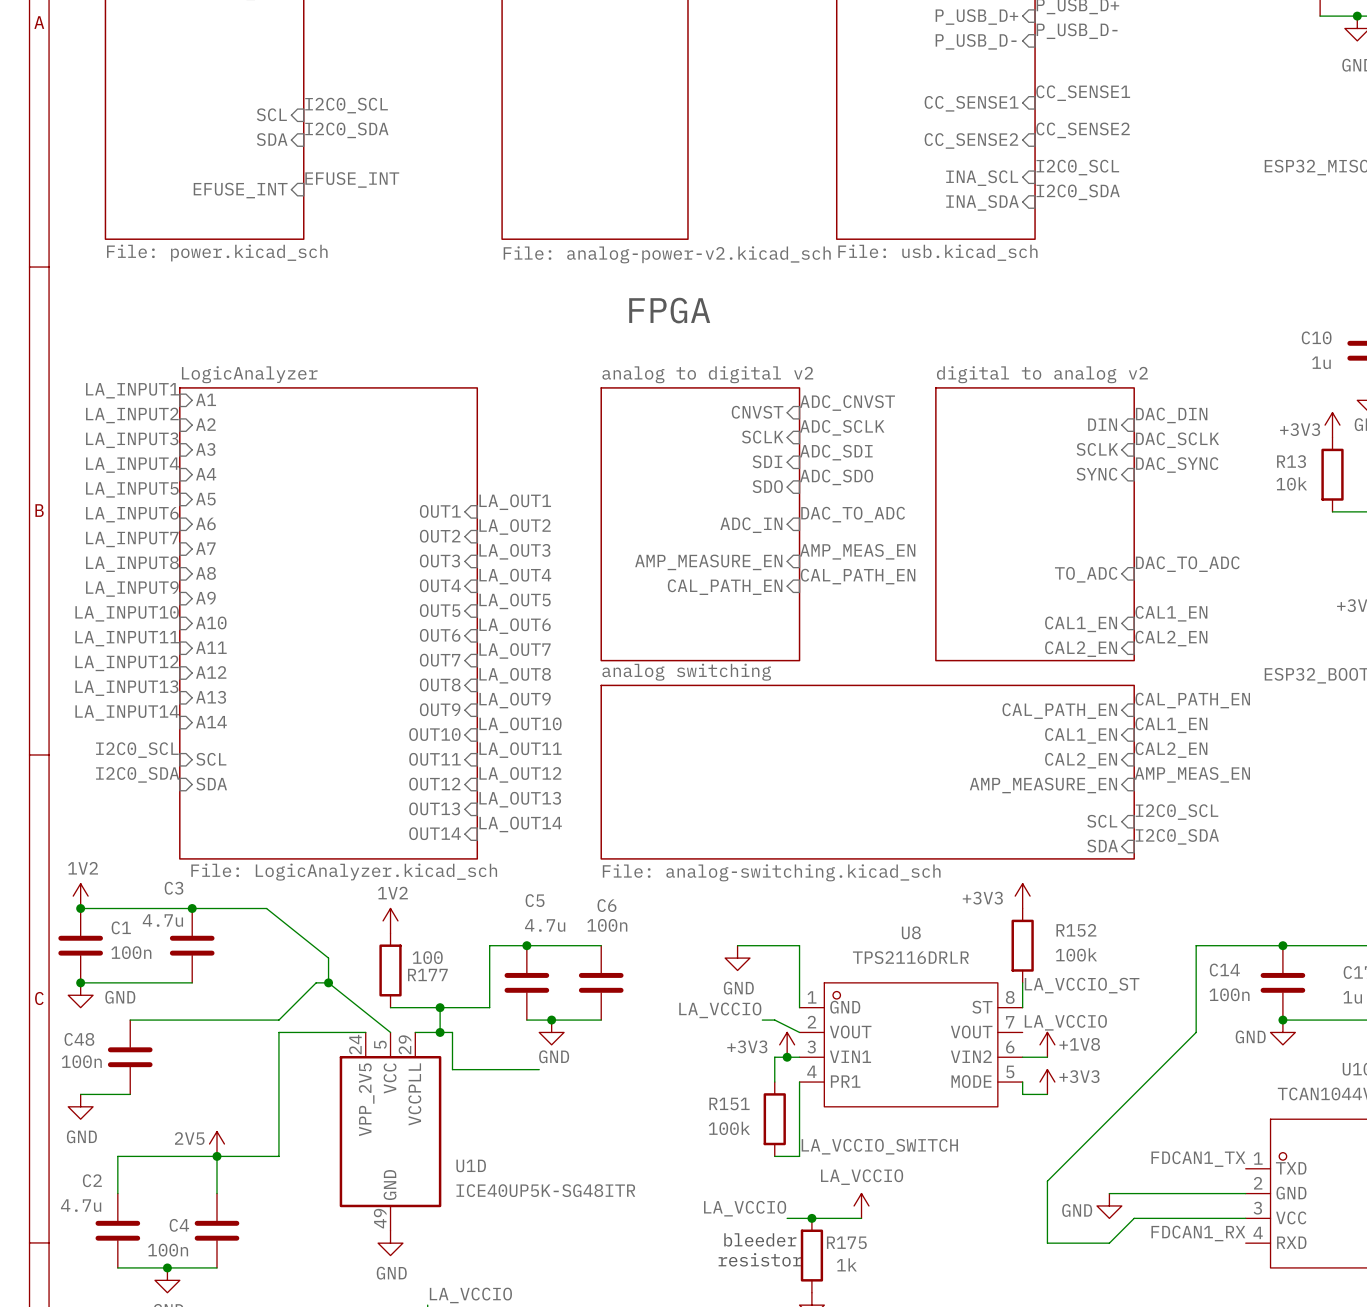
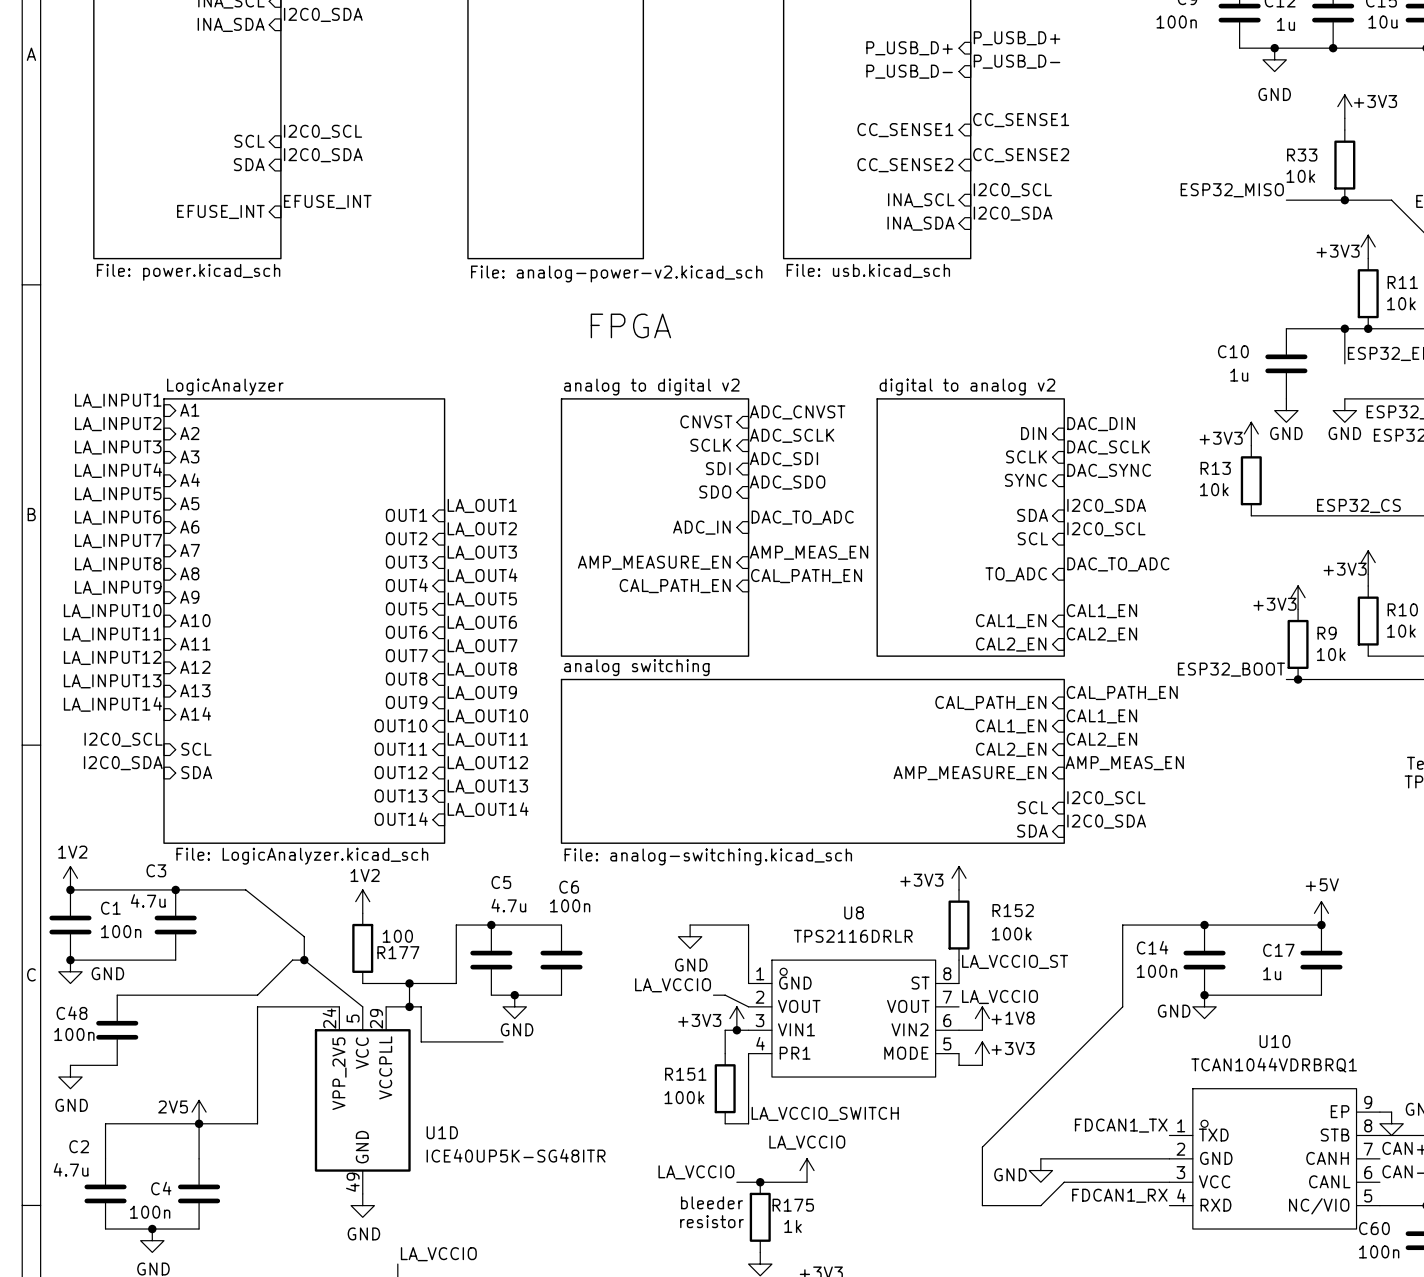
label: none -> I2C0_SDA (1106, 505)
sheet pin: none -> SDA (1032, 515)
label: none -> I2C0_SCL (1106, 529)
sheet pin: none -> SCL (1032, 538)

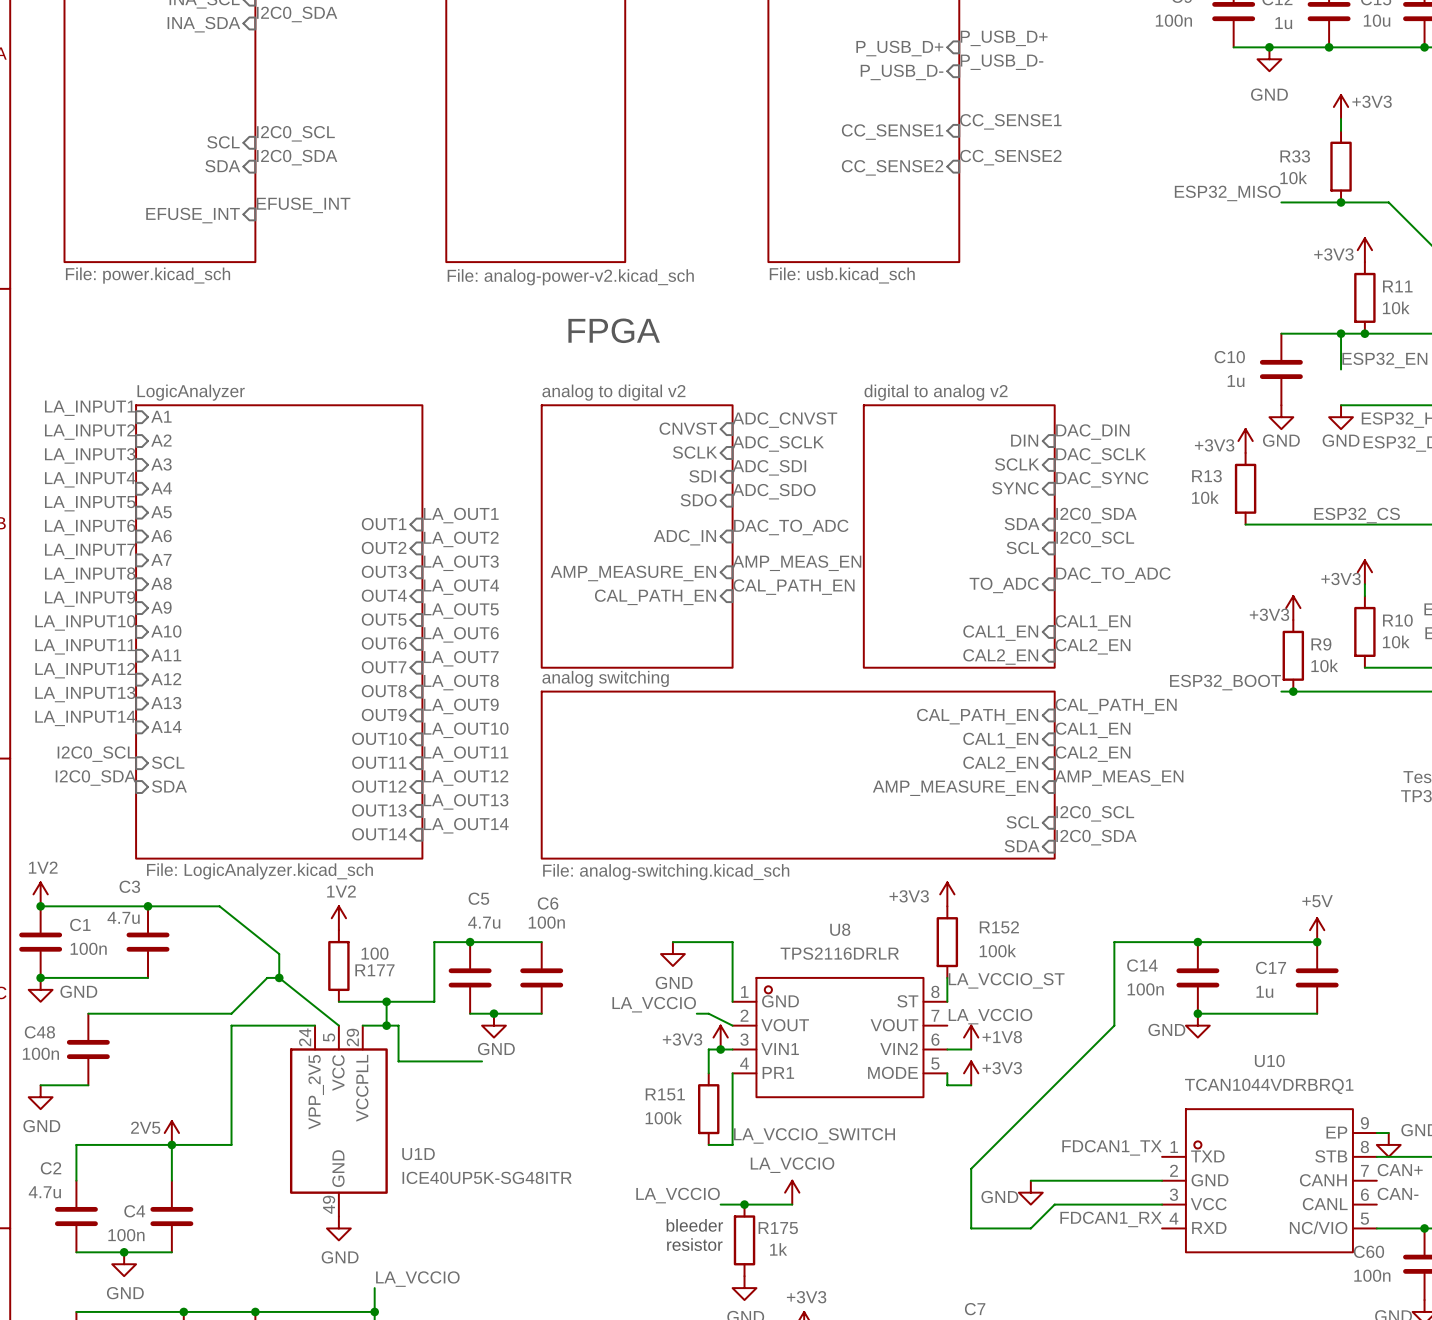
label: I2C0_SCL (1012, 190) -> none
sheet pin: INA_SCL (921, 200) -> none
label: I2C0_SDA (1013, 213) -> none
sheet pin: INA_SDA (920, 223) -> none

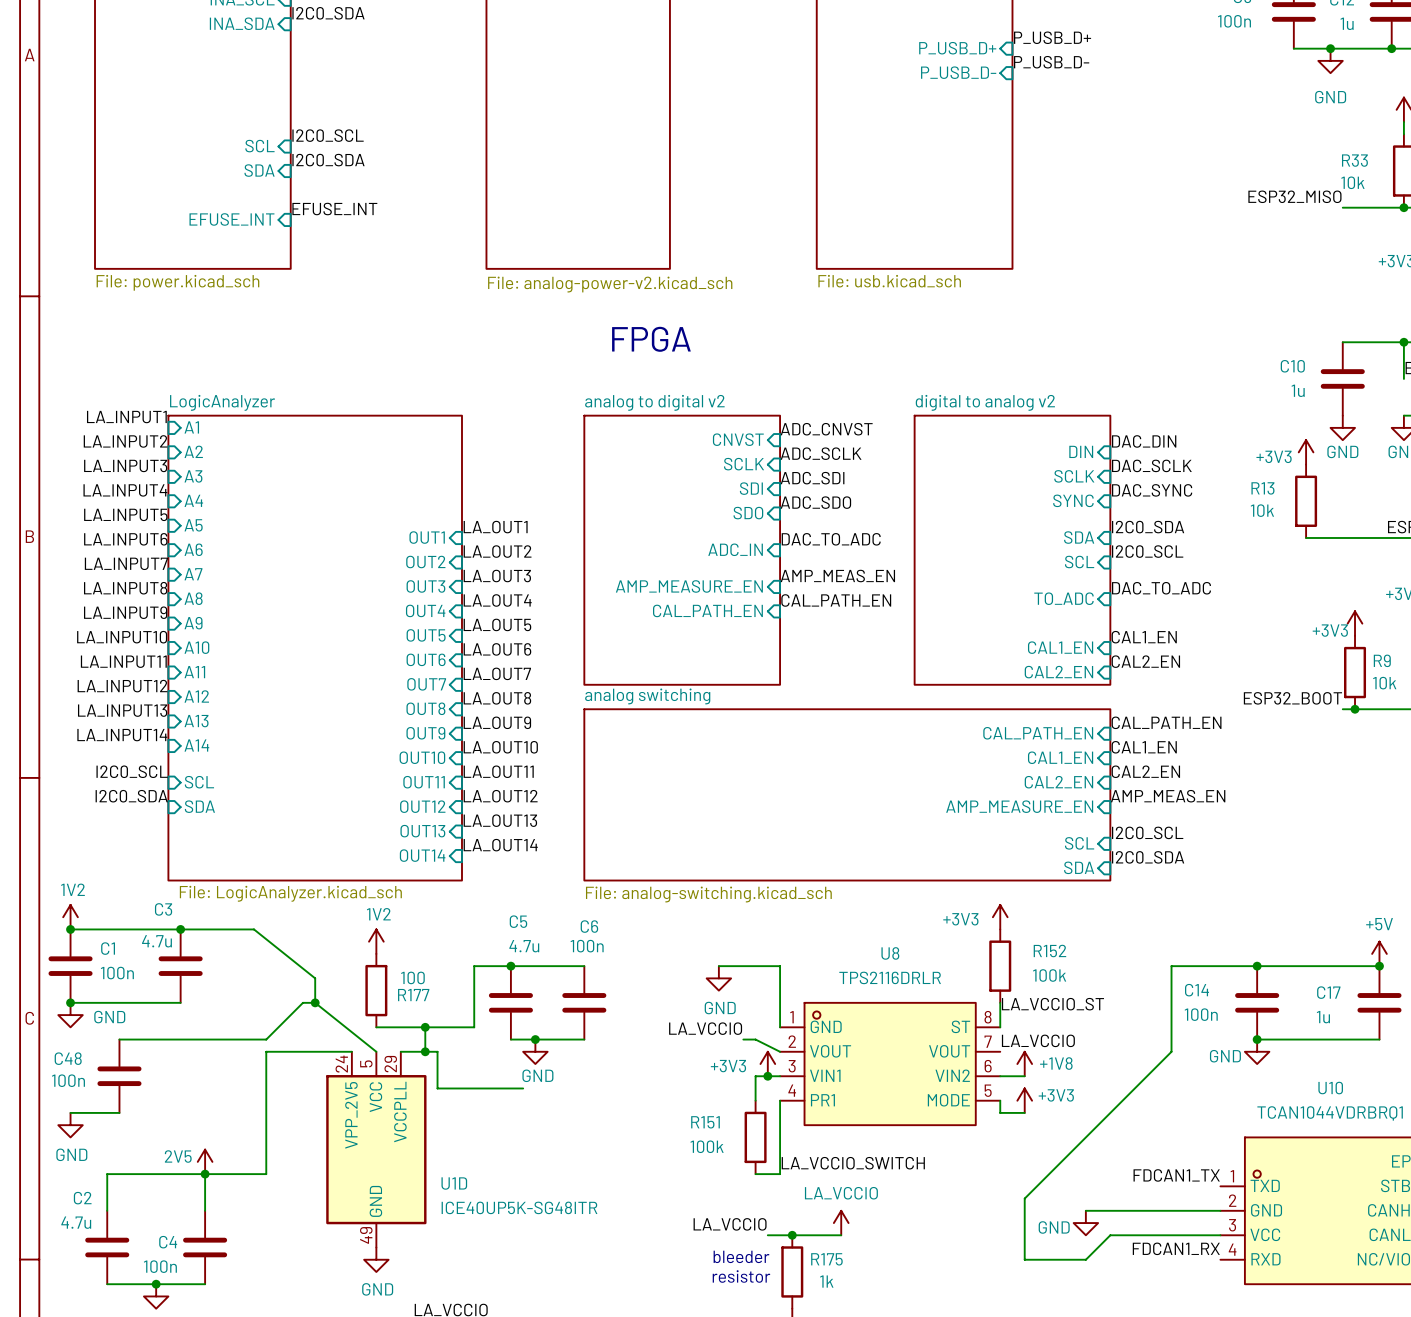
label: CC_SENSE1 (1010, 121) -> none
sheet pin: CC_SENSE1 (892, 132) -> none
label: CC_SENSE2 (1010, 157) -> none
sheet pin: CC_SENSE2 (892, 167) -> none

